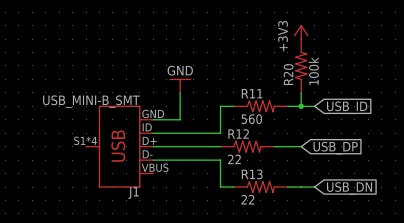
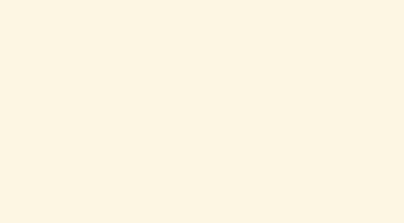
power symbol: +3V3 (301, 32) -> none
R20: 100k (301, 65) -> none
power symbol: GND (180, 85) -> none
wire: (180, 92) (180, 119) (153, 119) -> none
wire: (301, 92) (301, 106) -> none
wire: (233, 106) (220, 106) (220, 133) (153, 133) -> none
R11: 560 (260, 106) -> none
wire: (287, 106) (314, 106) -> none
junction: (301, 106) -> none
global label: USB_ID (347, 107) -> none
J1: USB_MINI-B_SMT (119, 146) -> none
wire: (153, 146) (220, 146) -> none
R12: 22 (247, 146) -> none
wire: (274, 146) (301, 146) -> none
global label: USB_DP (335, 148) -> none
wire: (153, 160) (220, 160) (220, 187) (233, 187) -> none
R13: 22 (260, 187) -> none
wire: (287, 187) (314, 187) -> none
global label: USB_DN (349, 188) -> none

